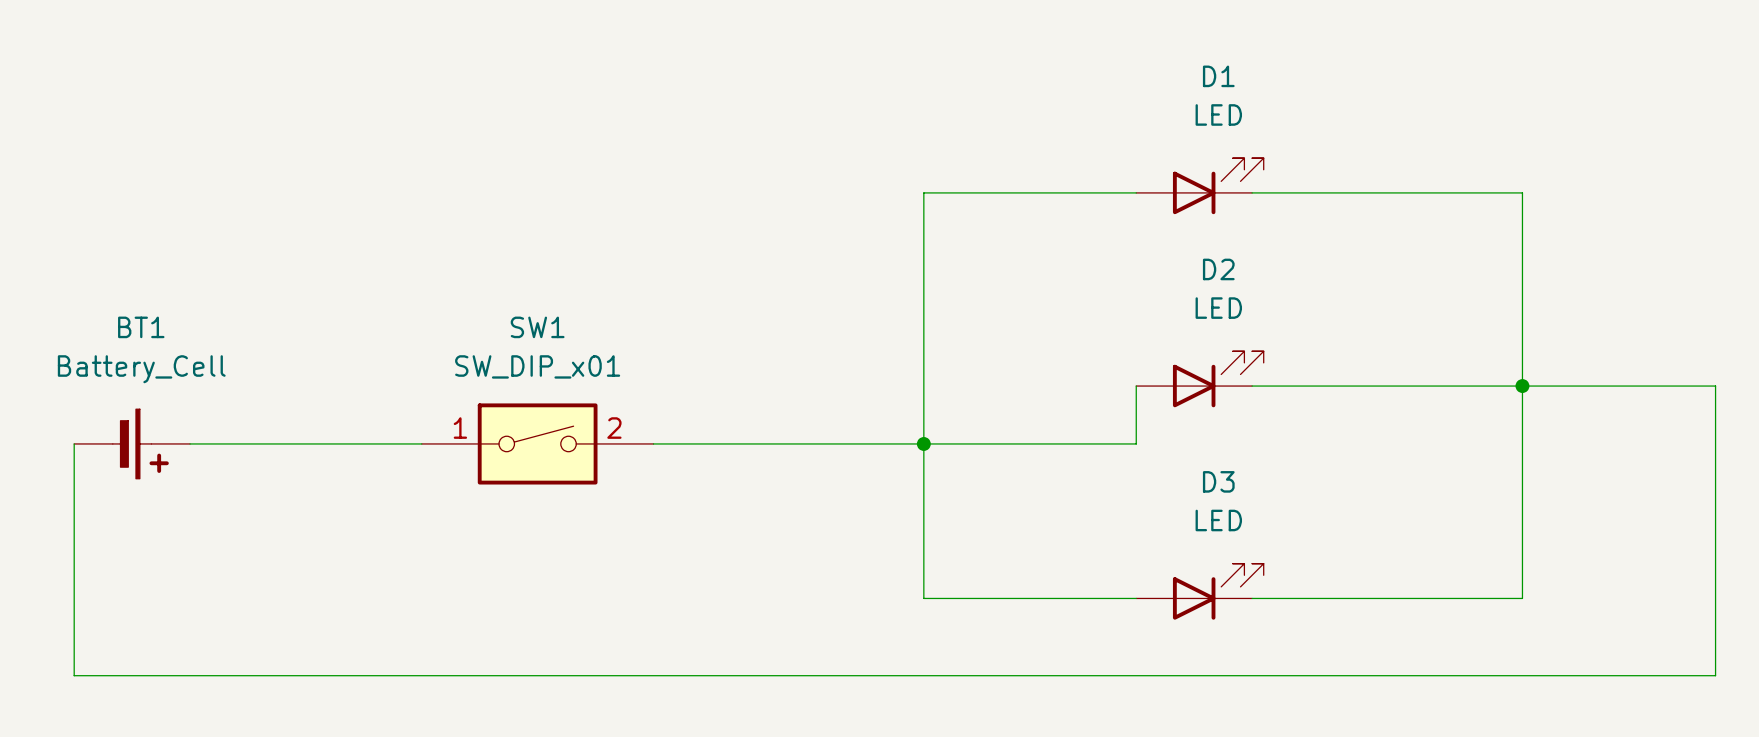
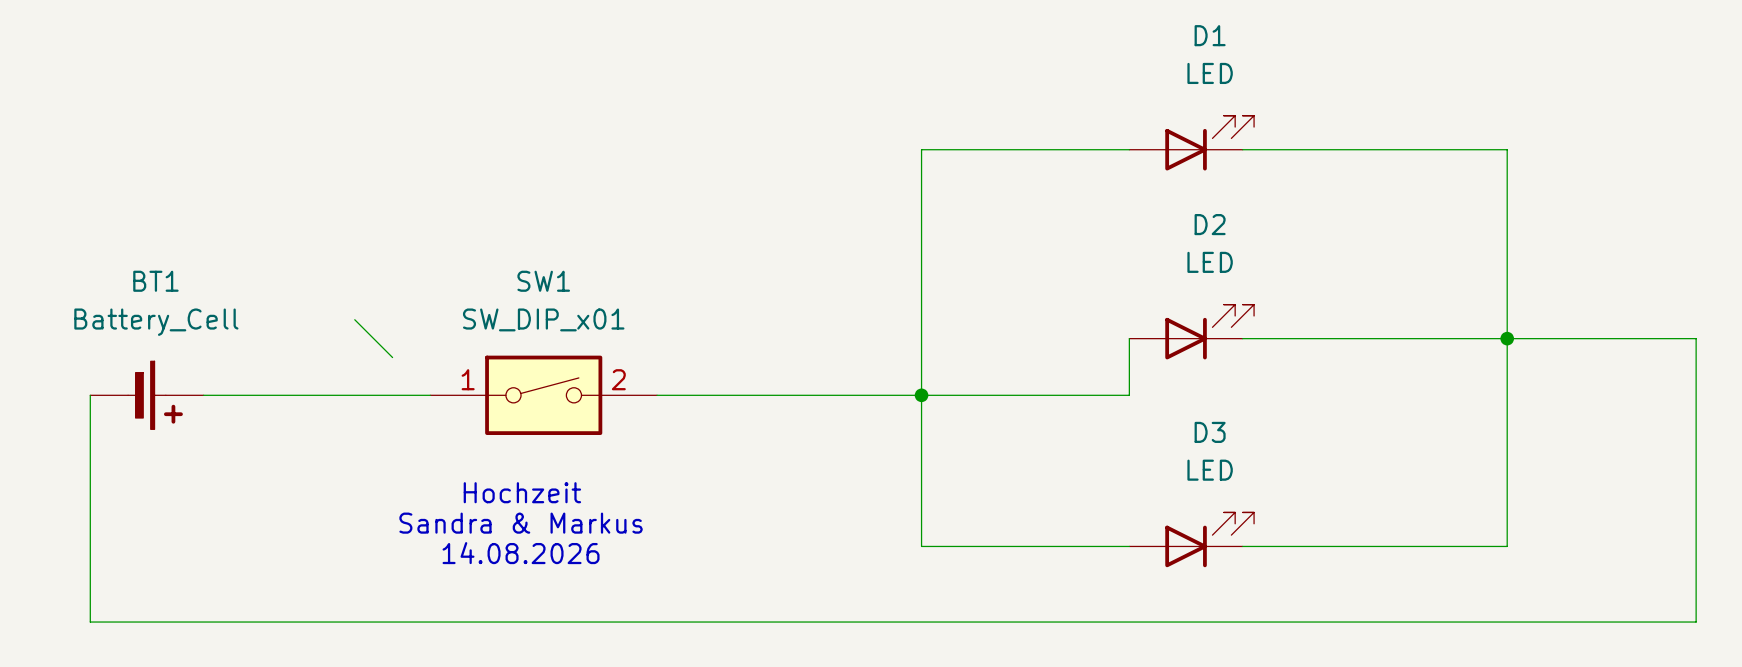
wire: none -> (354, 319) (392, 357)
text: none -> Hochzeit (522, 492)
text: none -> Sandra & Markus (521, 523)
text: none -> 14.08.2026 (521, 553)

